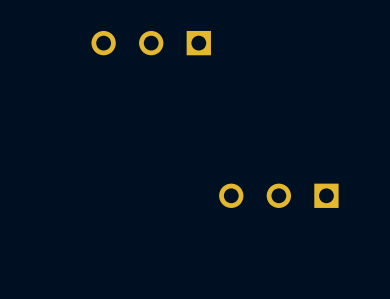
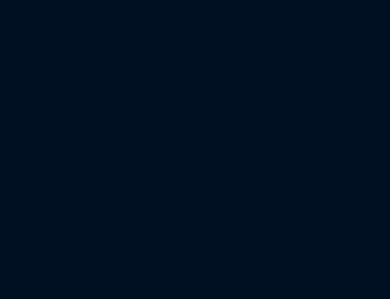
part: (151, 43) -> none
part: (278, 195) -> none

